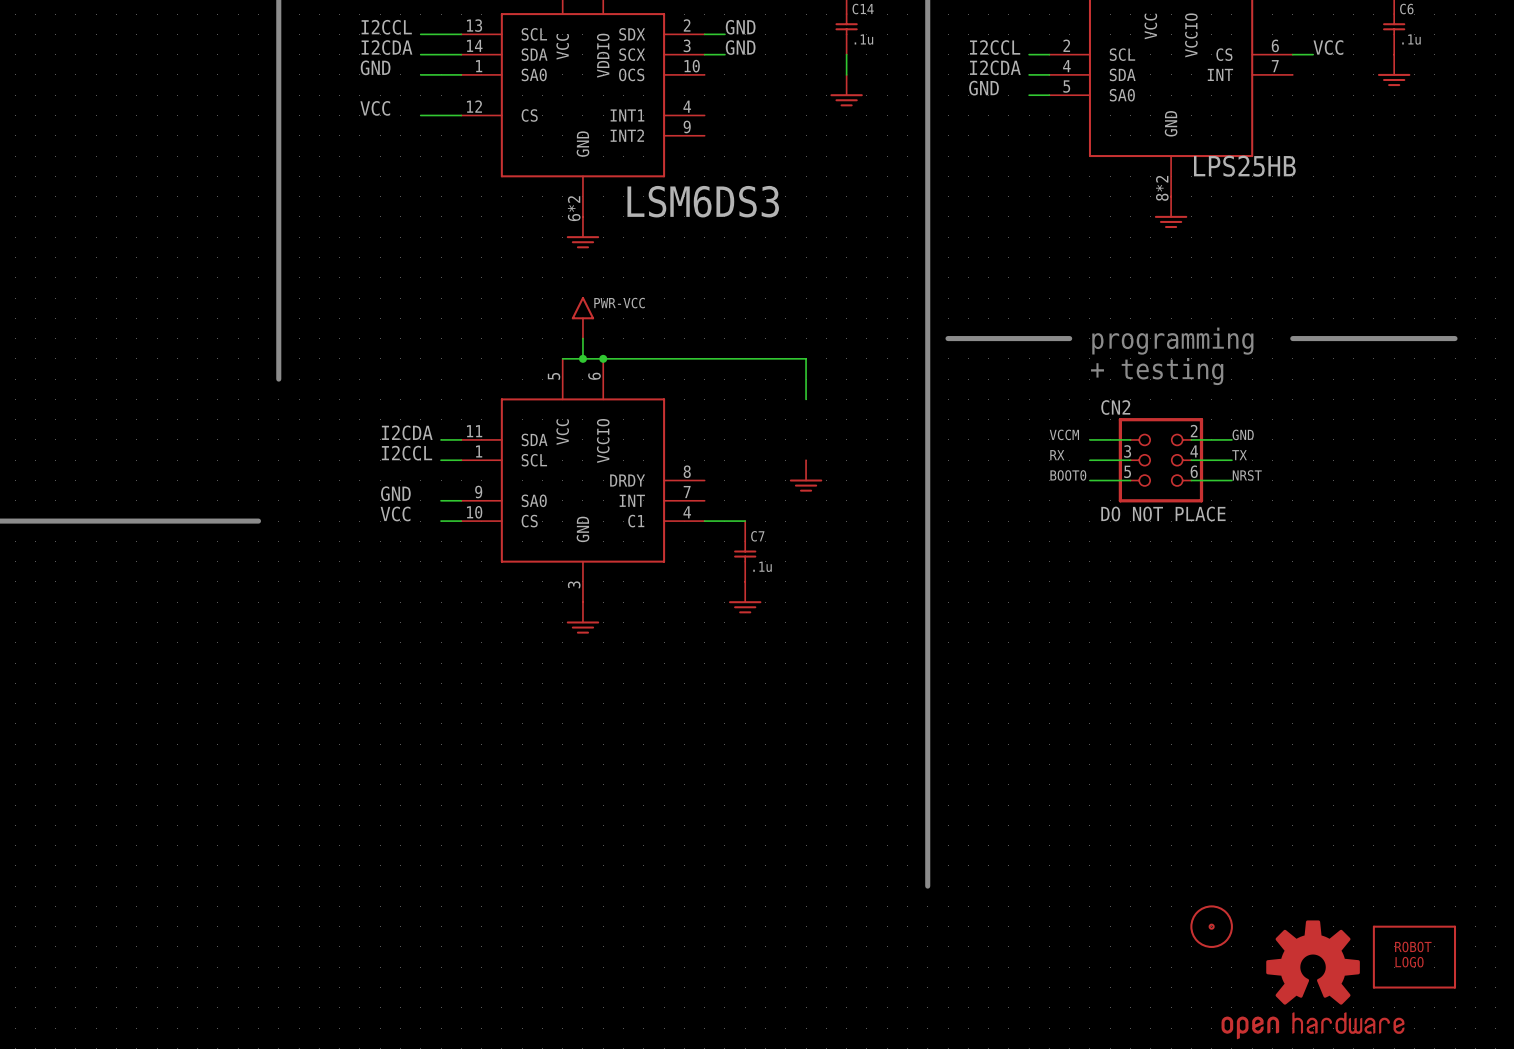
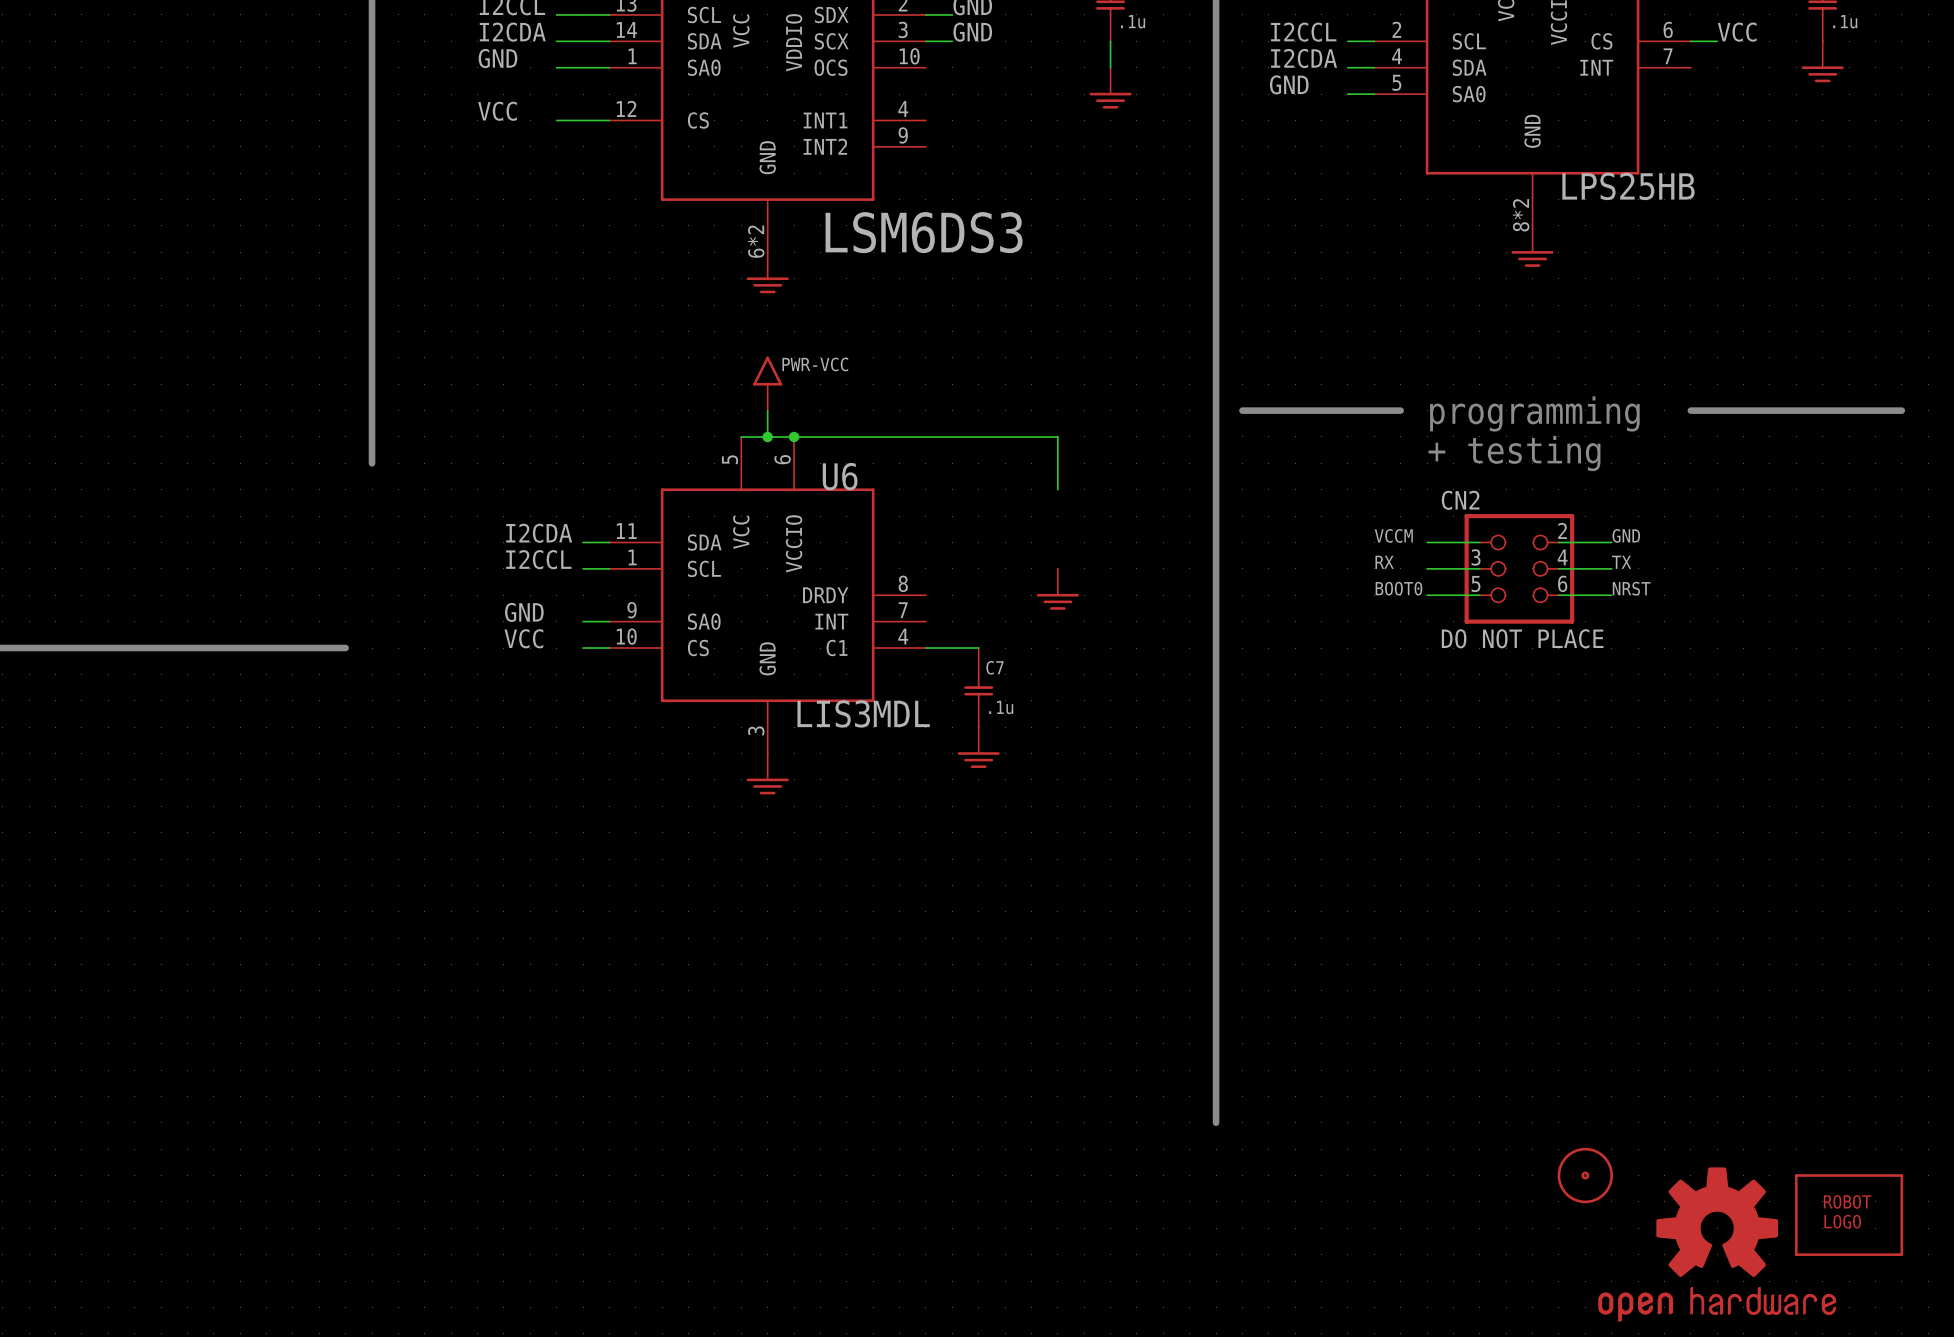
U6 name: none -> U6 (840, 476)
U6 value: none -> LIS3MDL (863, 713)

